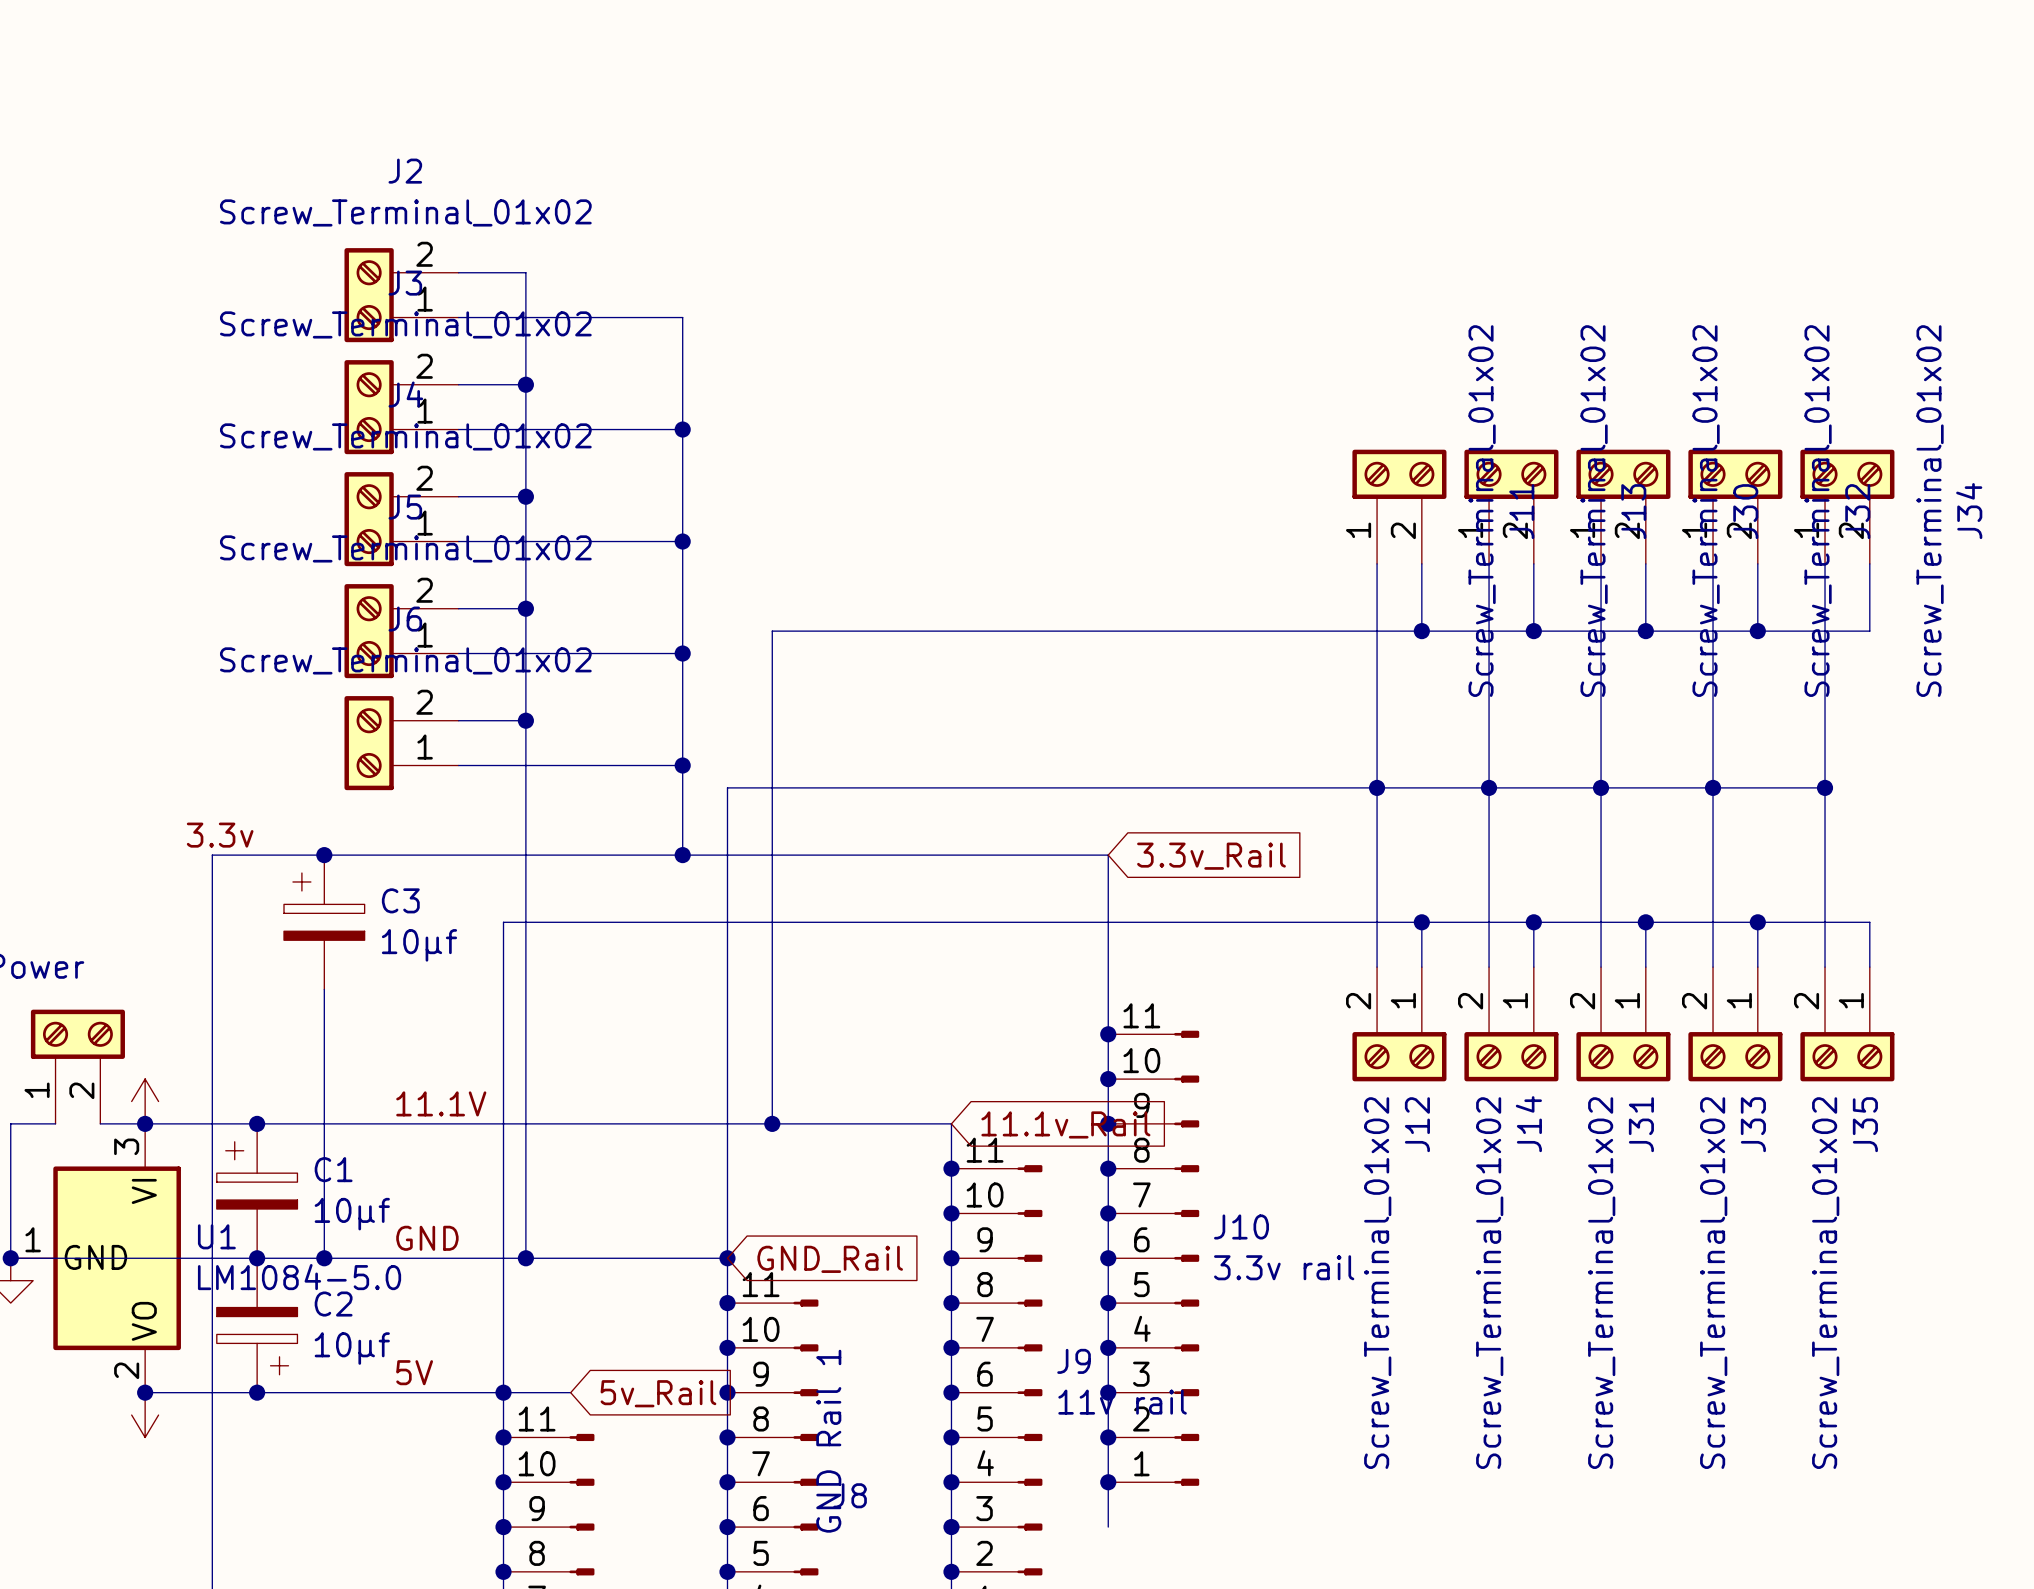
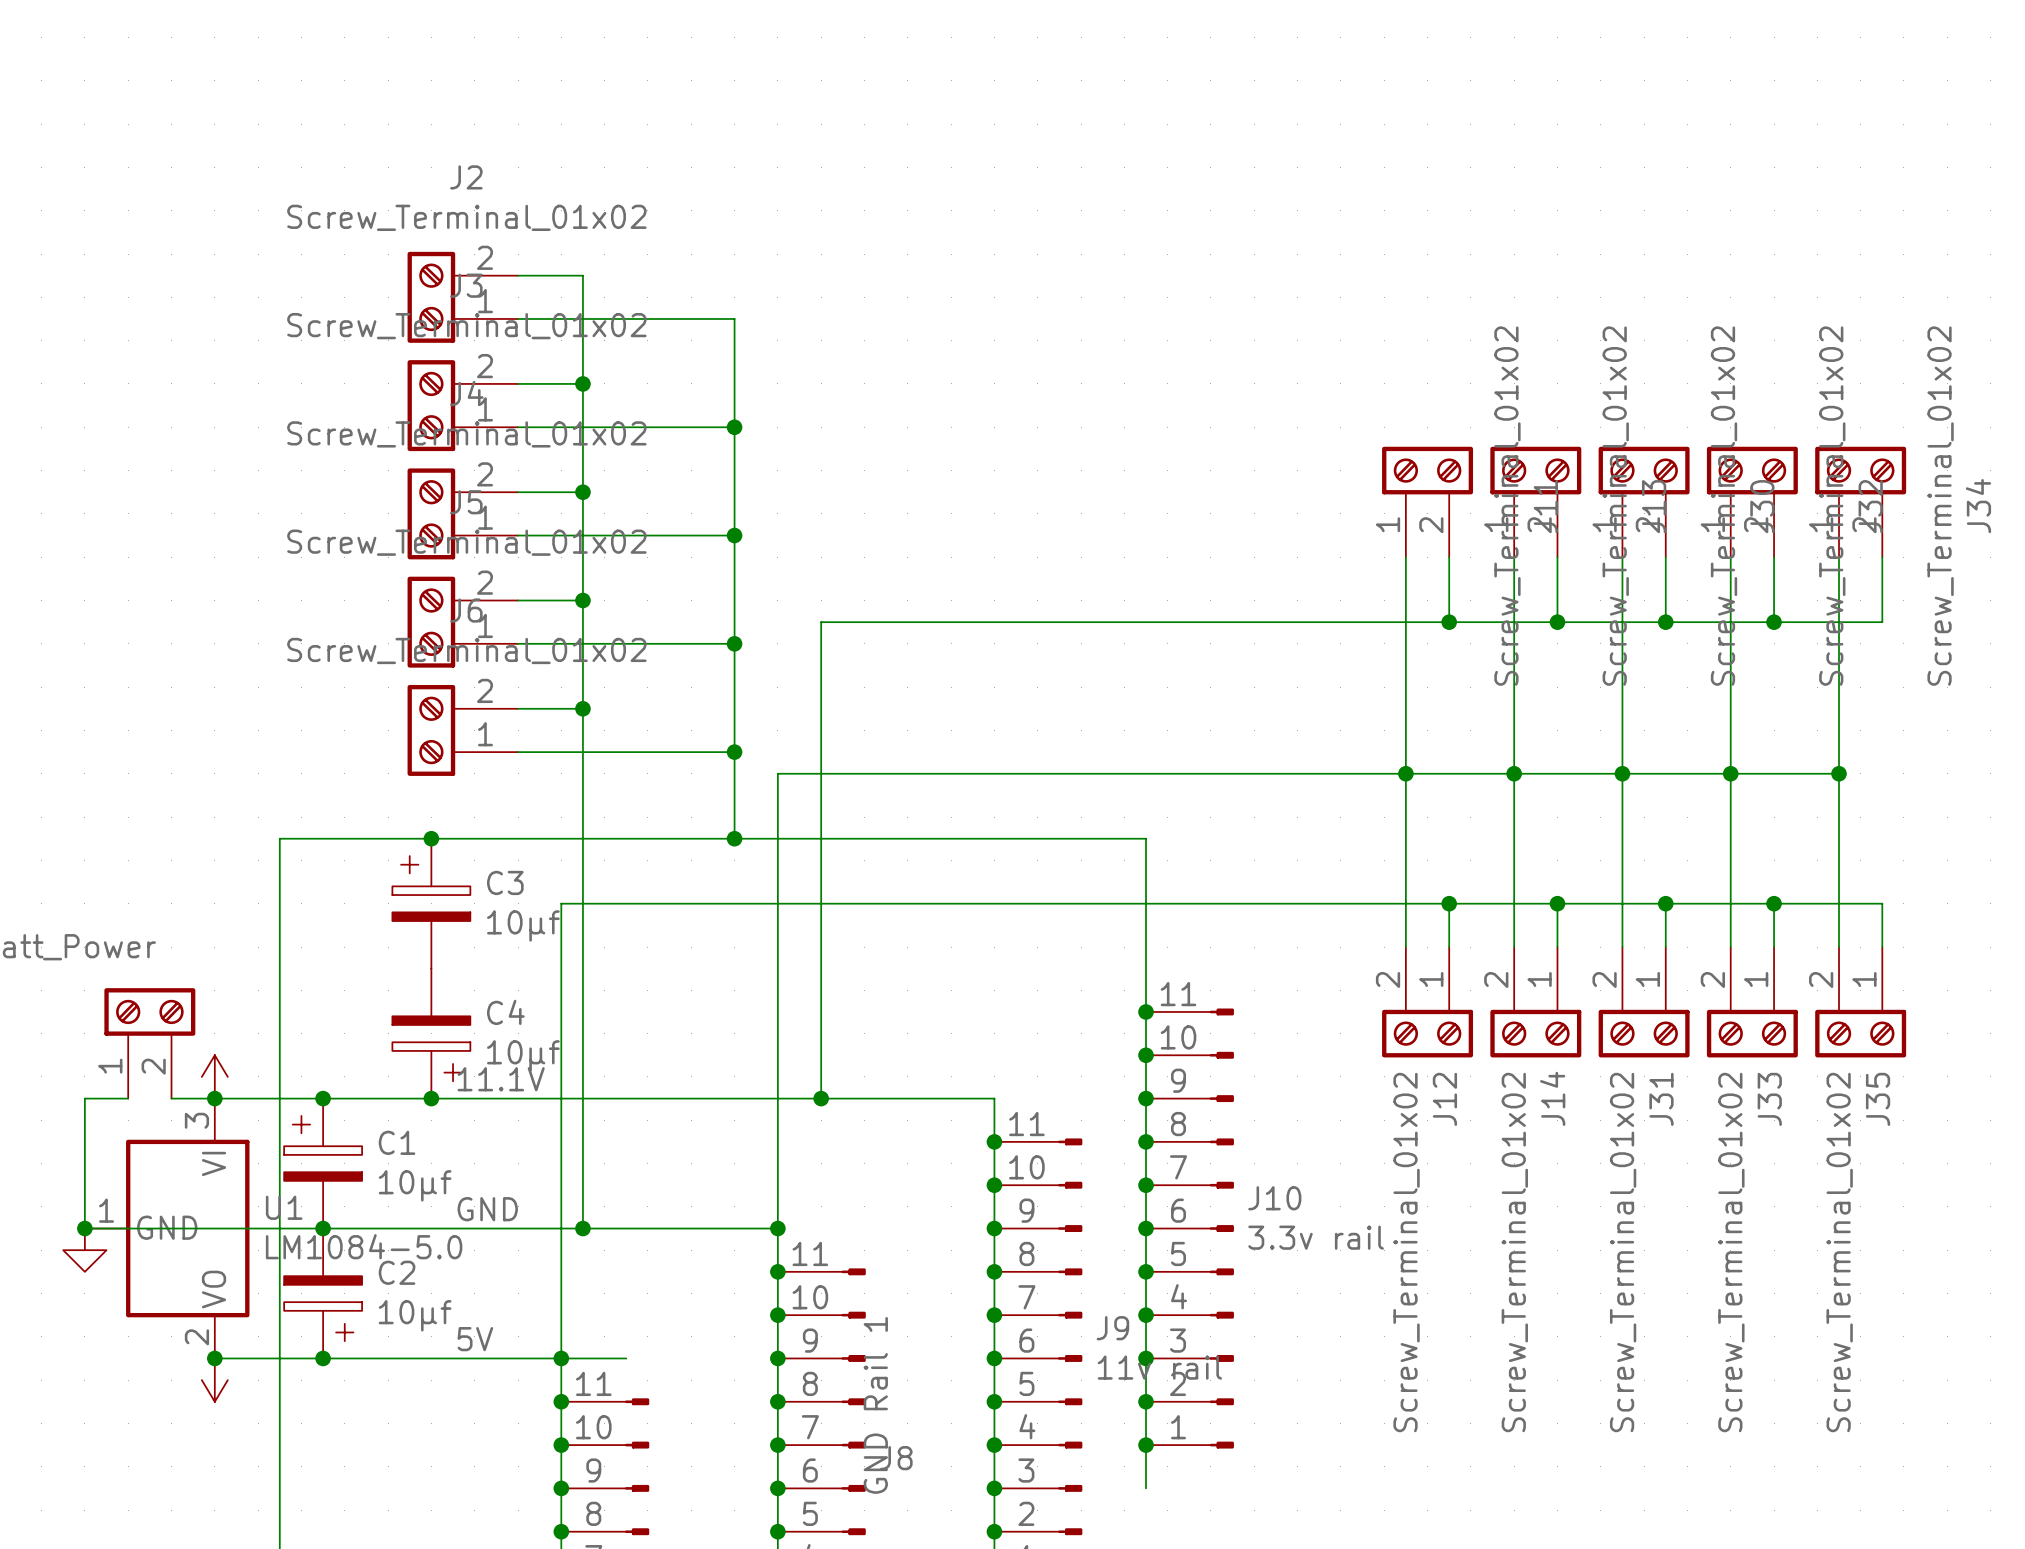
label: 3.3v (220, 835) -> none
junction position: (324, 855) -> (431, 838)
global label: 3.3v_Rail (1211, 856) -> none
C3 position: (324, 922) -> (431, 903)
wire: (324, 989) (324, 1258) -> none
C4: none -> 10μf (431, 1033)
junction: none -> (431, 1098)
global label: 11.1v_Rail (1065, 1124) -> none
junction: (324, 1258) -> none
global label: GND_Rail (830, 1259) -> none
global label: 5v_Rail (658, 1393) -> none

